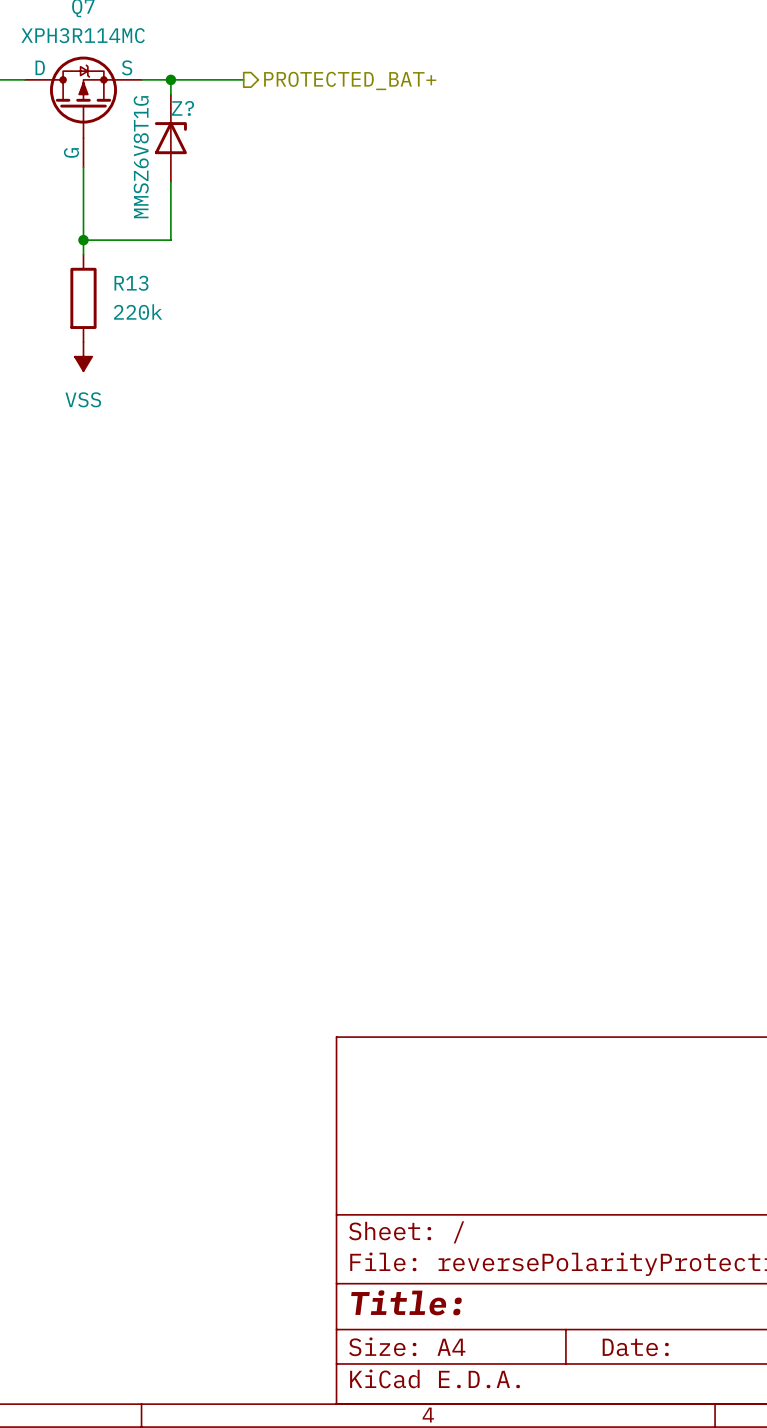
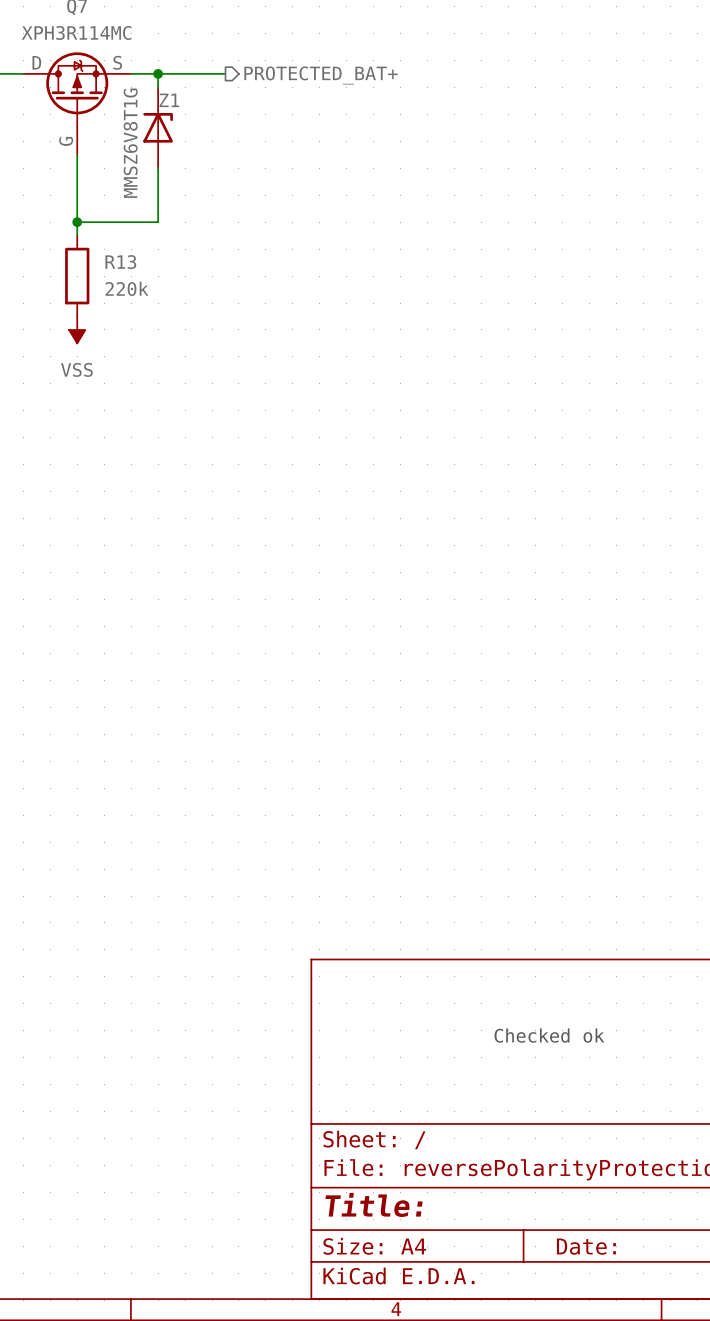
Z? name: Z? (182, 108) -> Z1 (169, 100)
text: none -> Checked ok (549, 1035)

